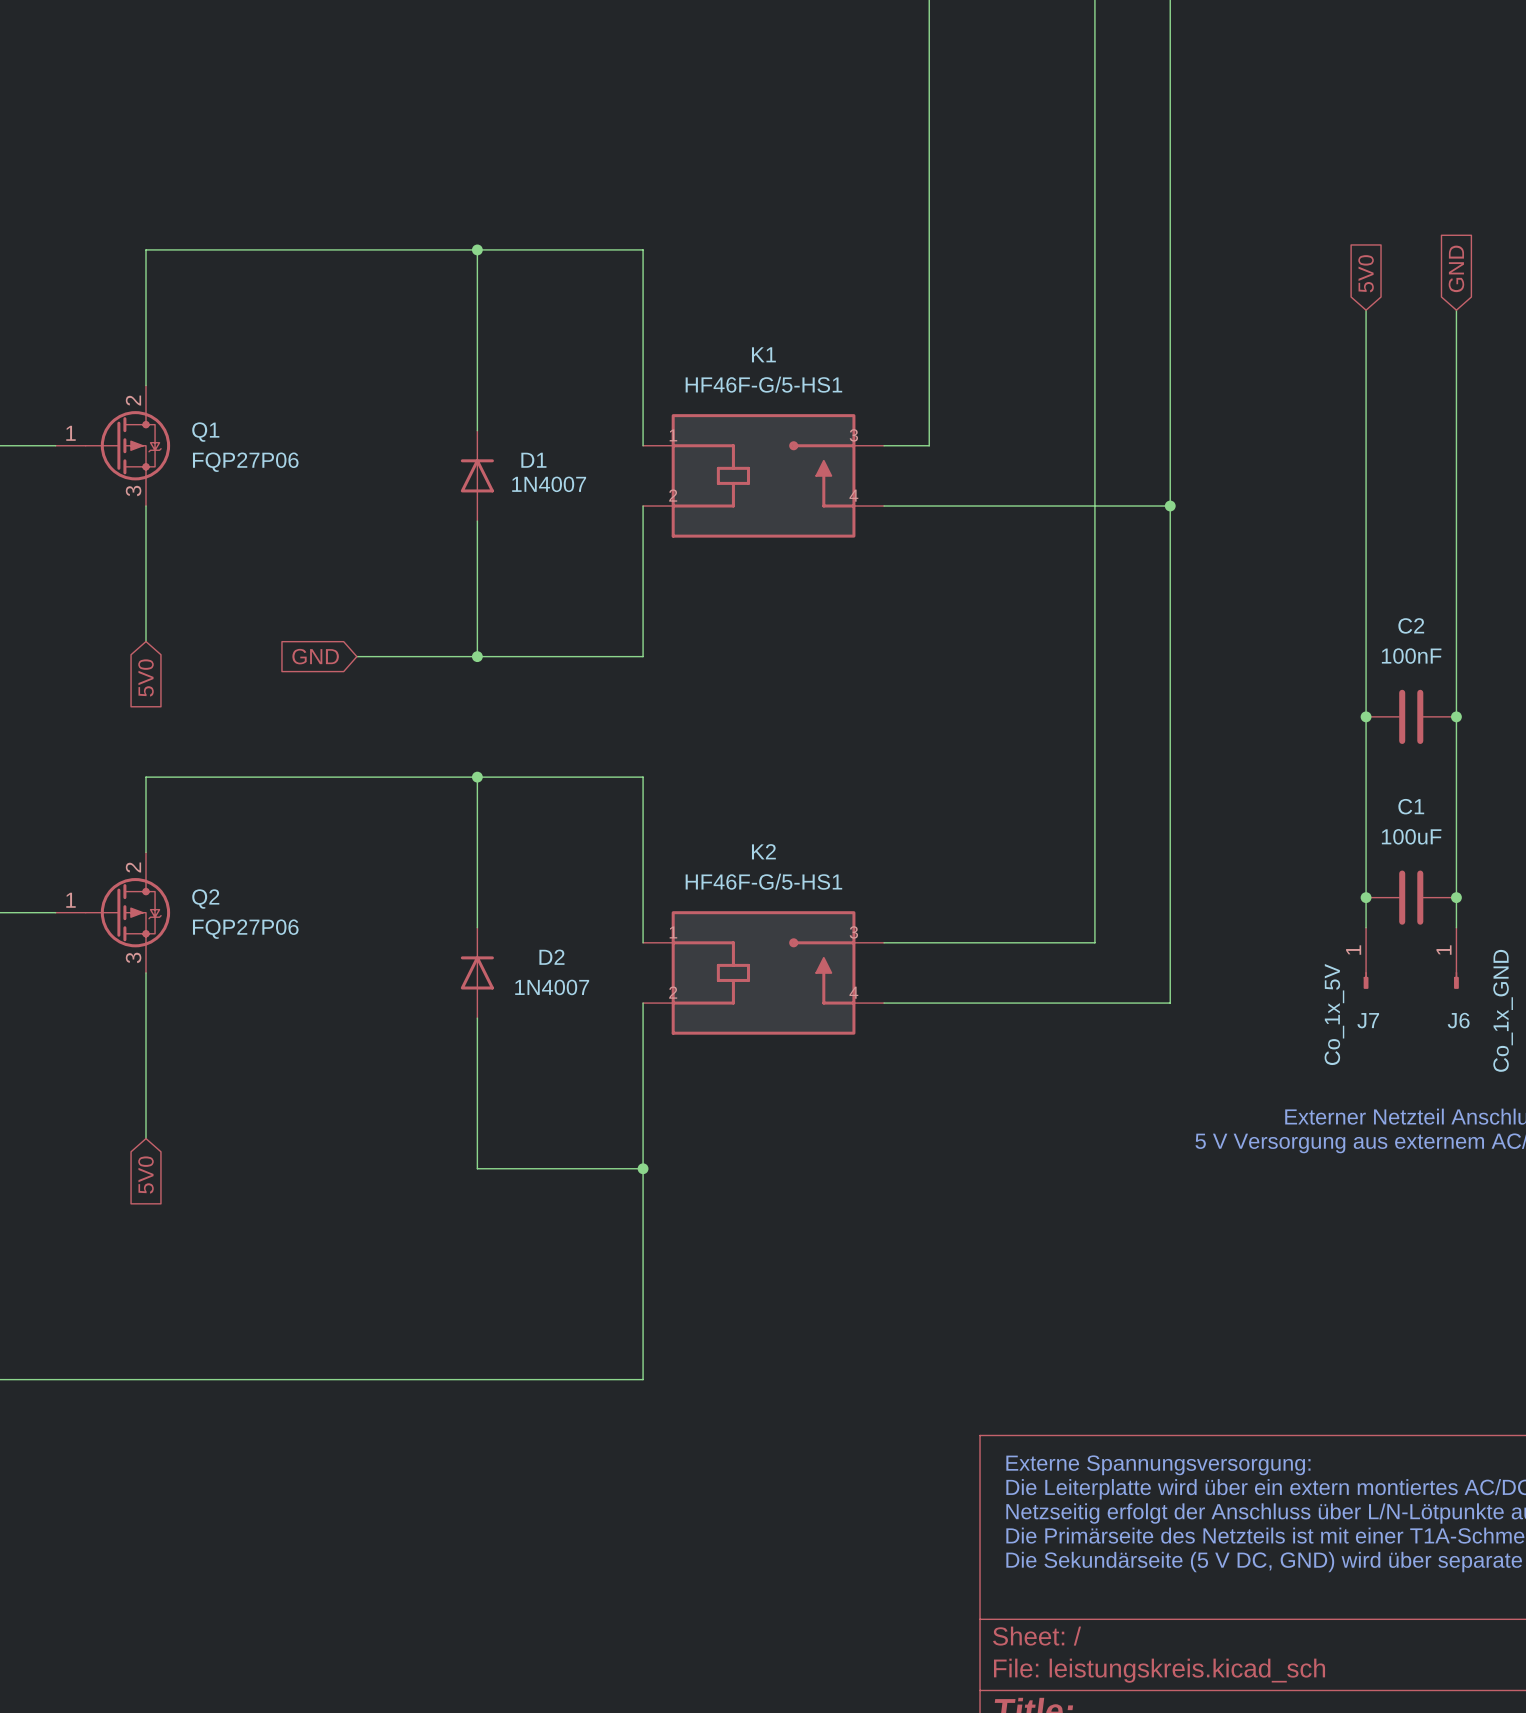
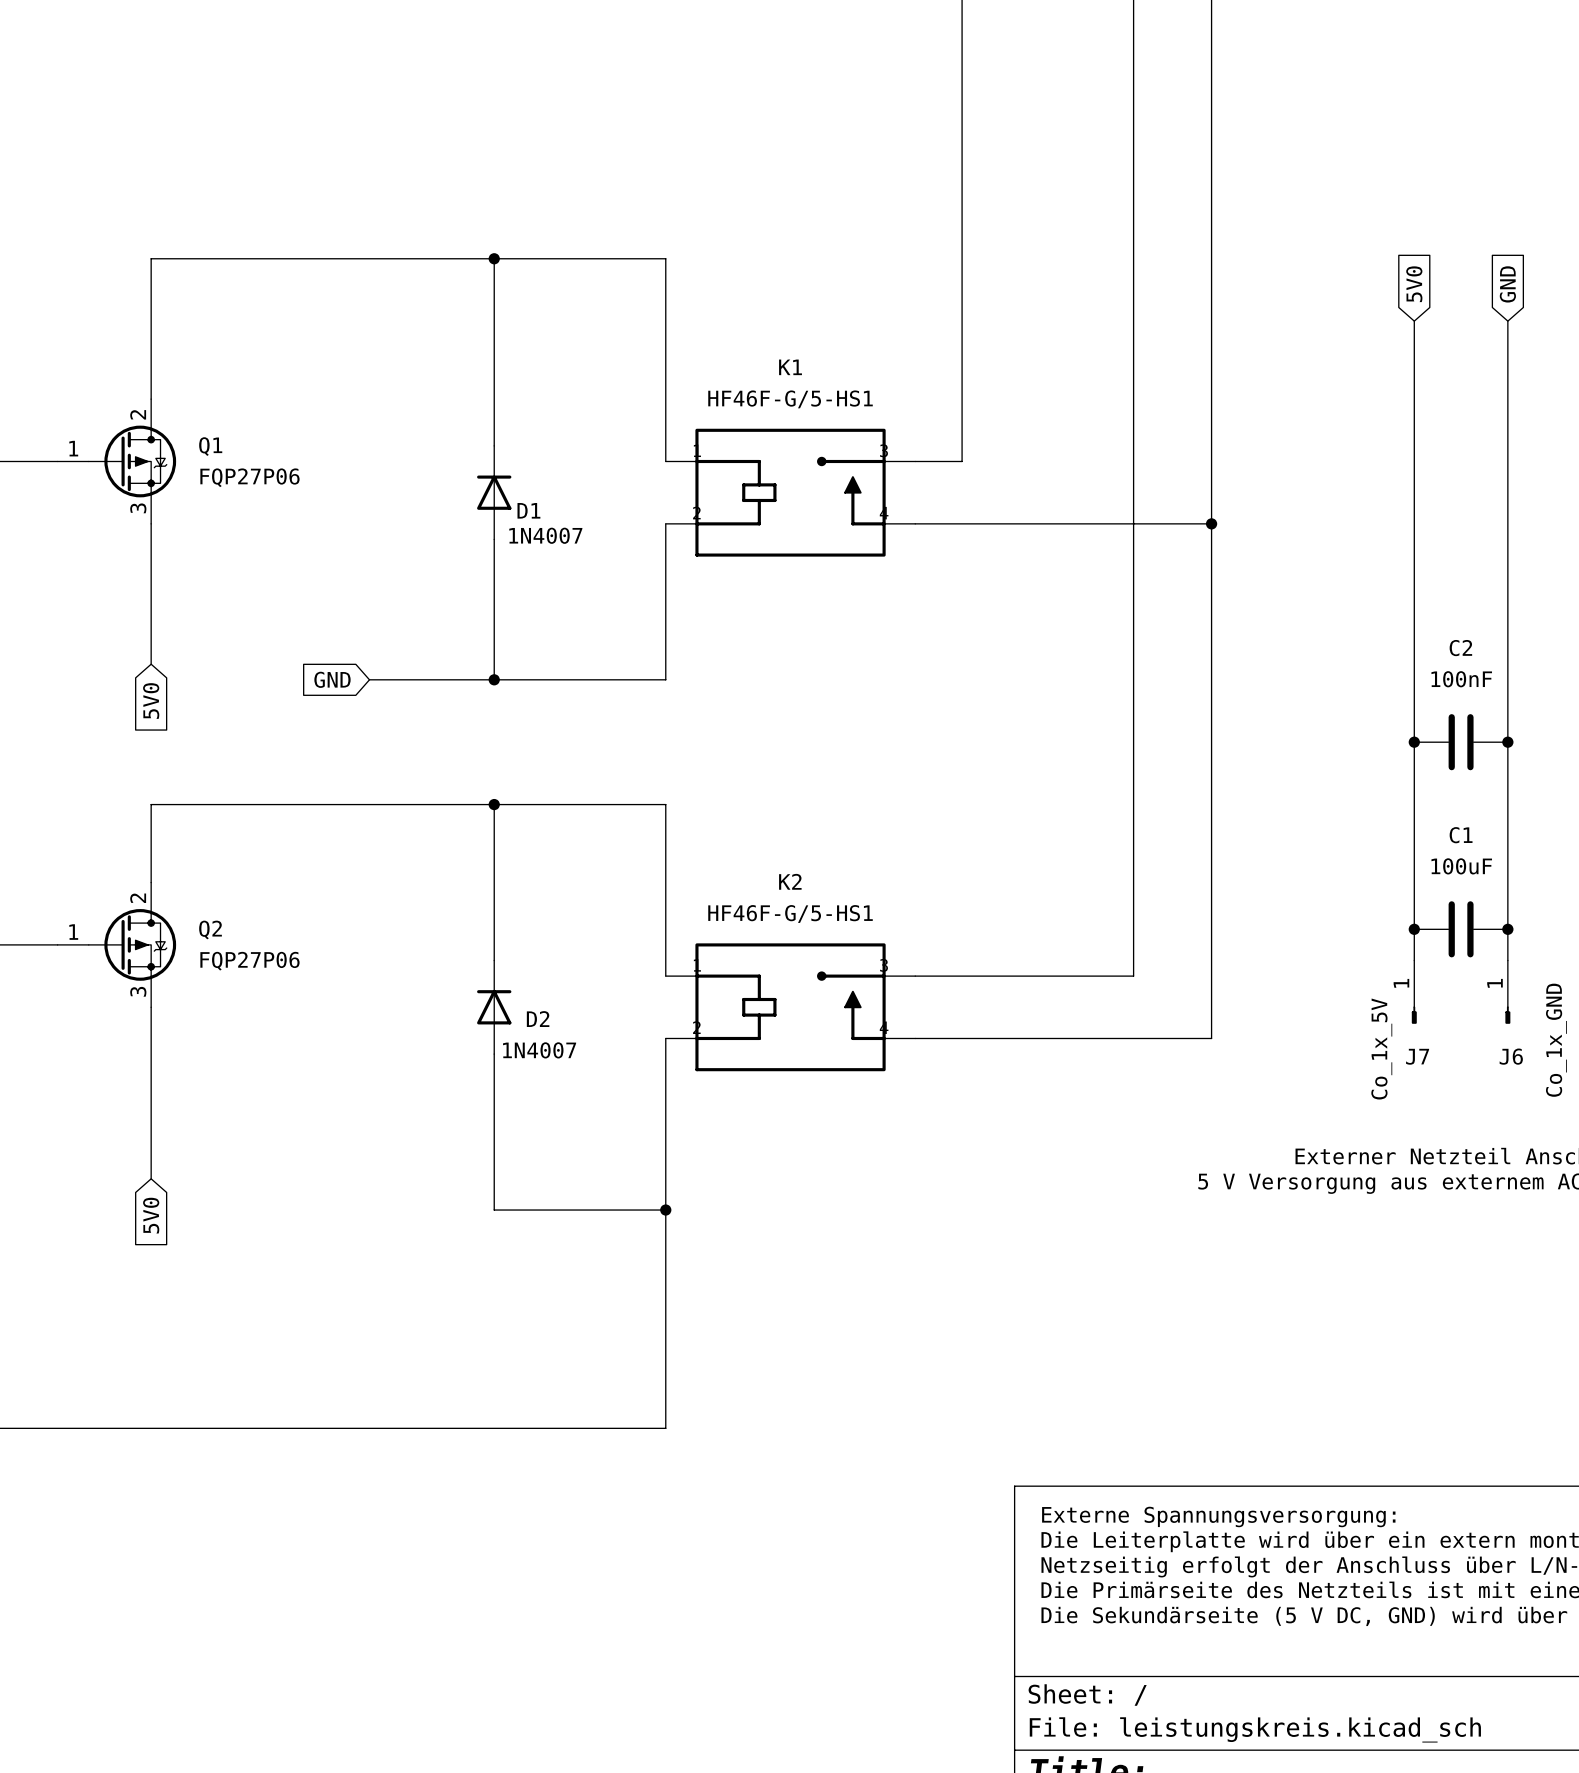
D1 name position: D1 (533, 460) -> D1 (528, 510)
D1 value position: 1N4007 (549, 484) -> 1N4007 (545, 535)
D2 name position: D2 (551, 957) -> D2 (538, 1019)
D2 value position: 1N4007 (552, 987) -> 1N4007 (539, 1050)

